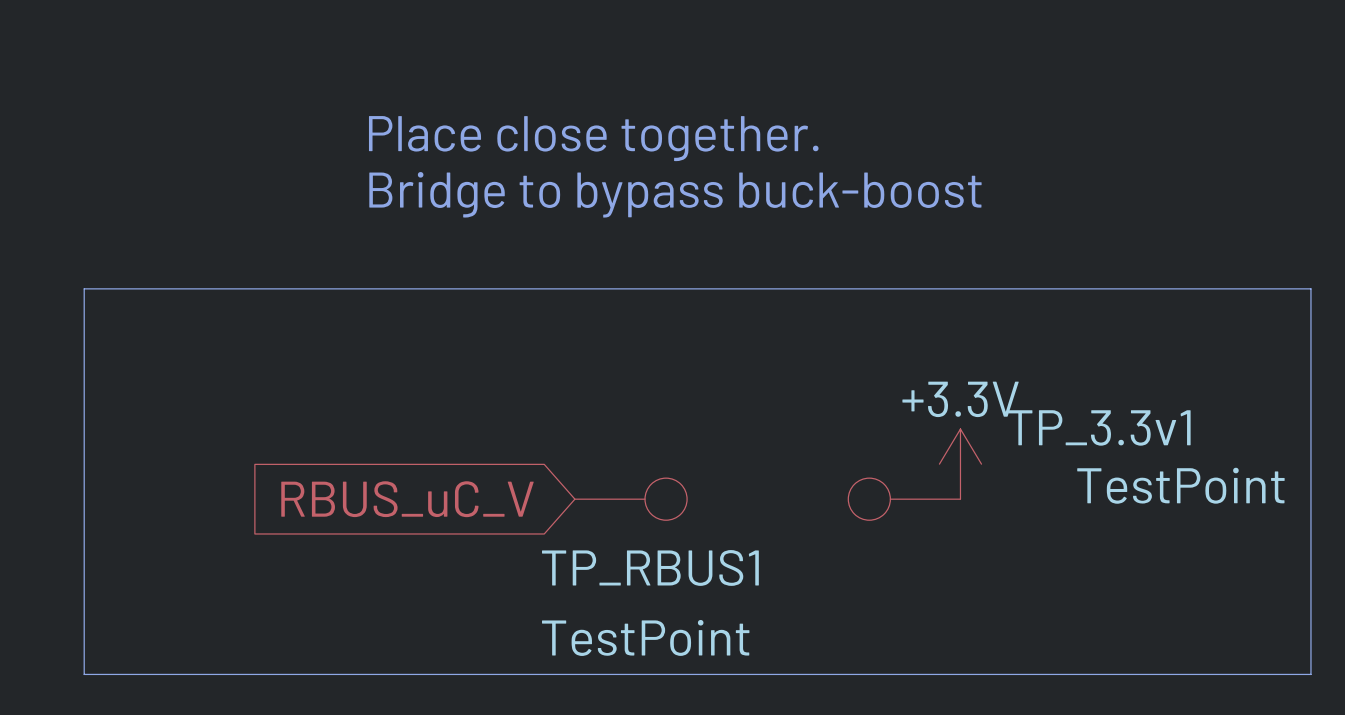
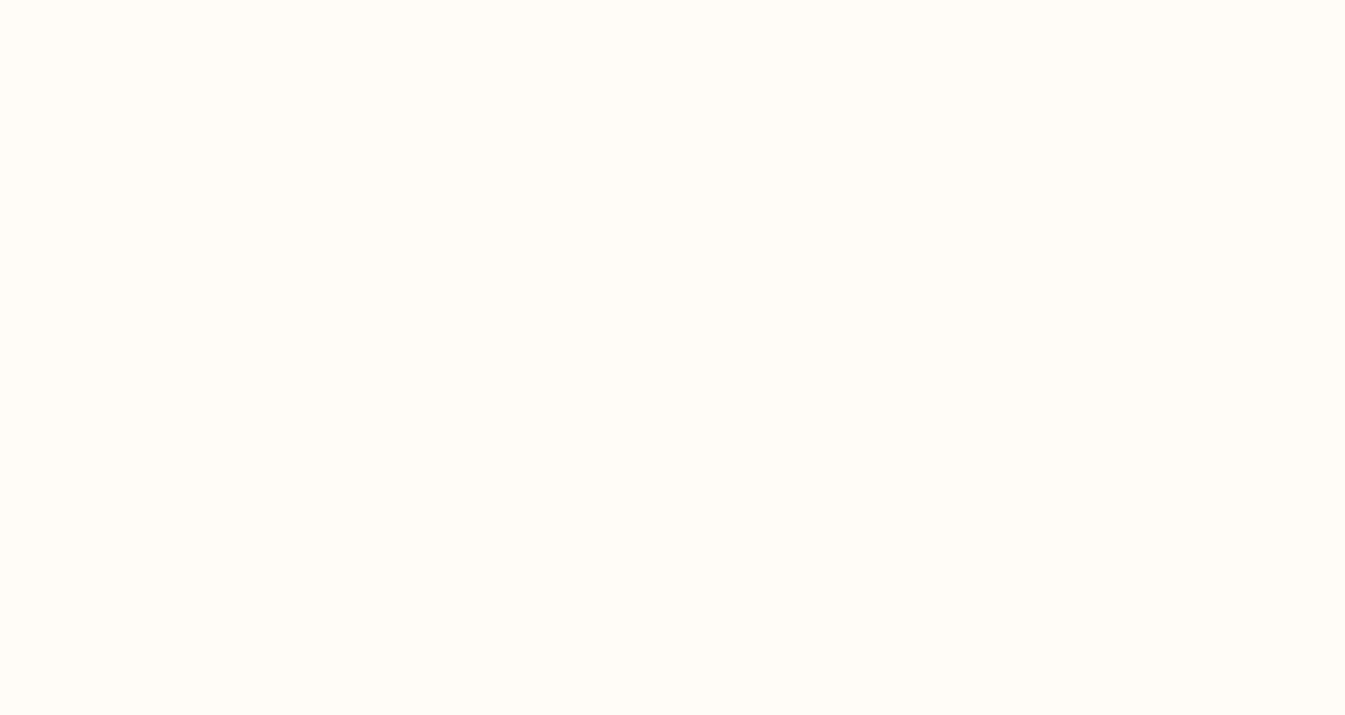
text: Place close together. (593, 138) -> none
text: Bridge to bypass buck-boost (675, 194) -> none
line: (84, 288) (84, 674) (1310, 674) (1310, 288) (84, 288) -> none
power symbol: +3.3V (960, 464) -> none
global label: RBUS_uC_V (407, 499) -> none
TP_RBUS1: TestPoint (630, 499) -> none
TP_3.3v1: TestPoint (904, 499) -> none

